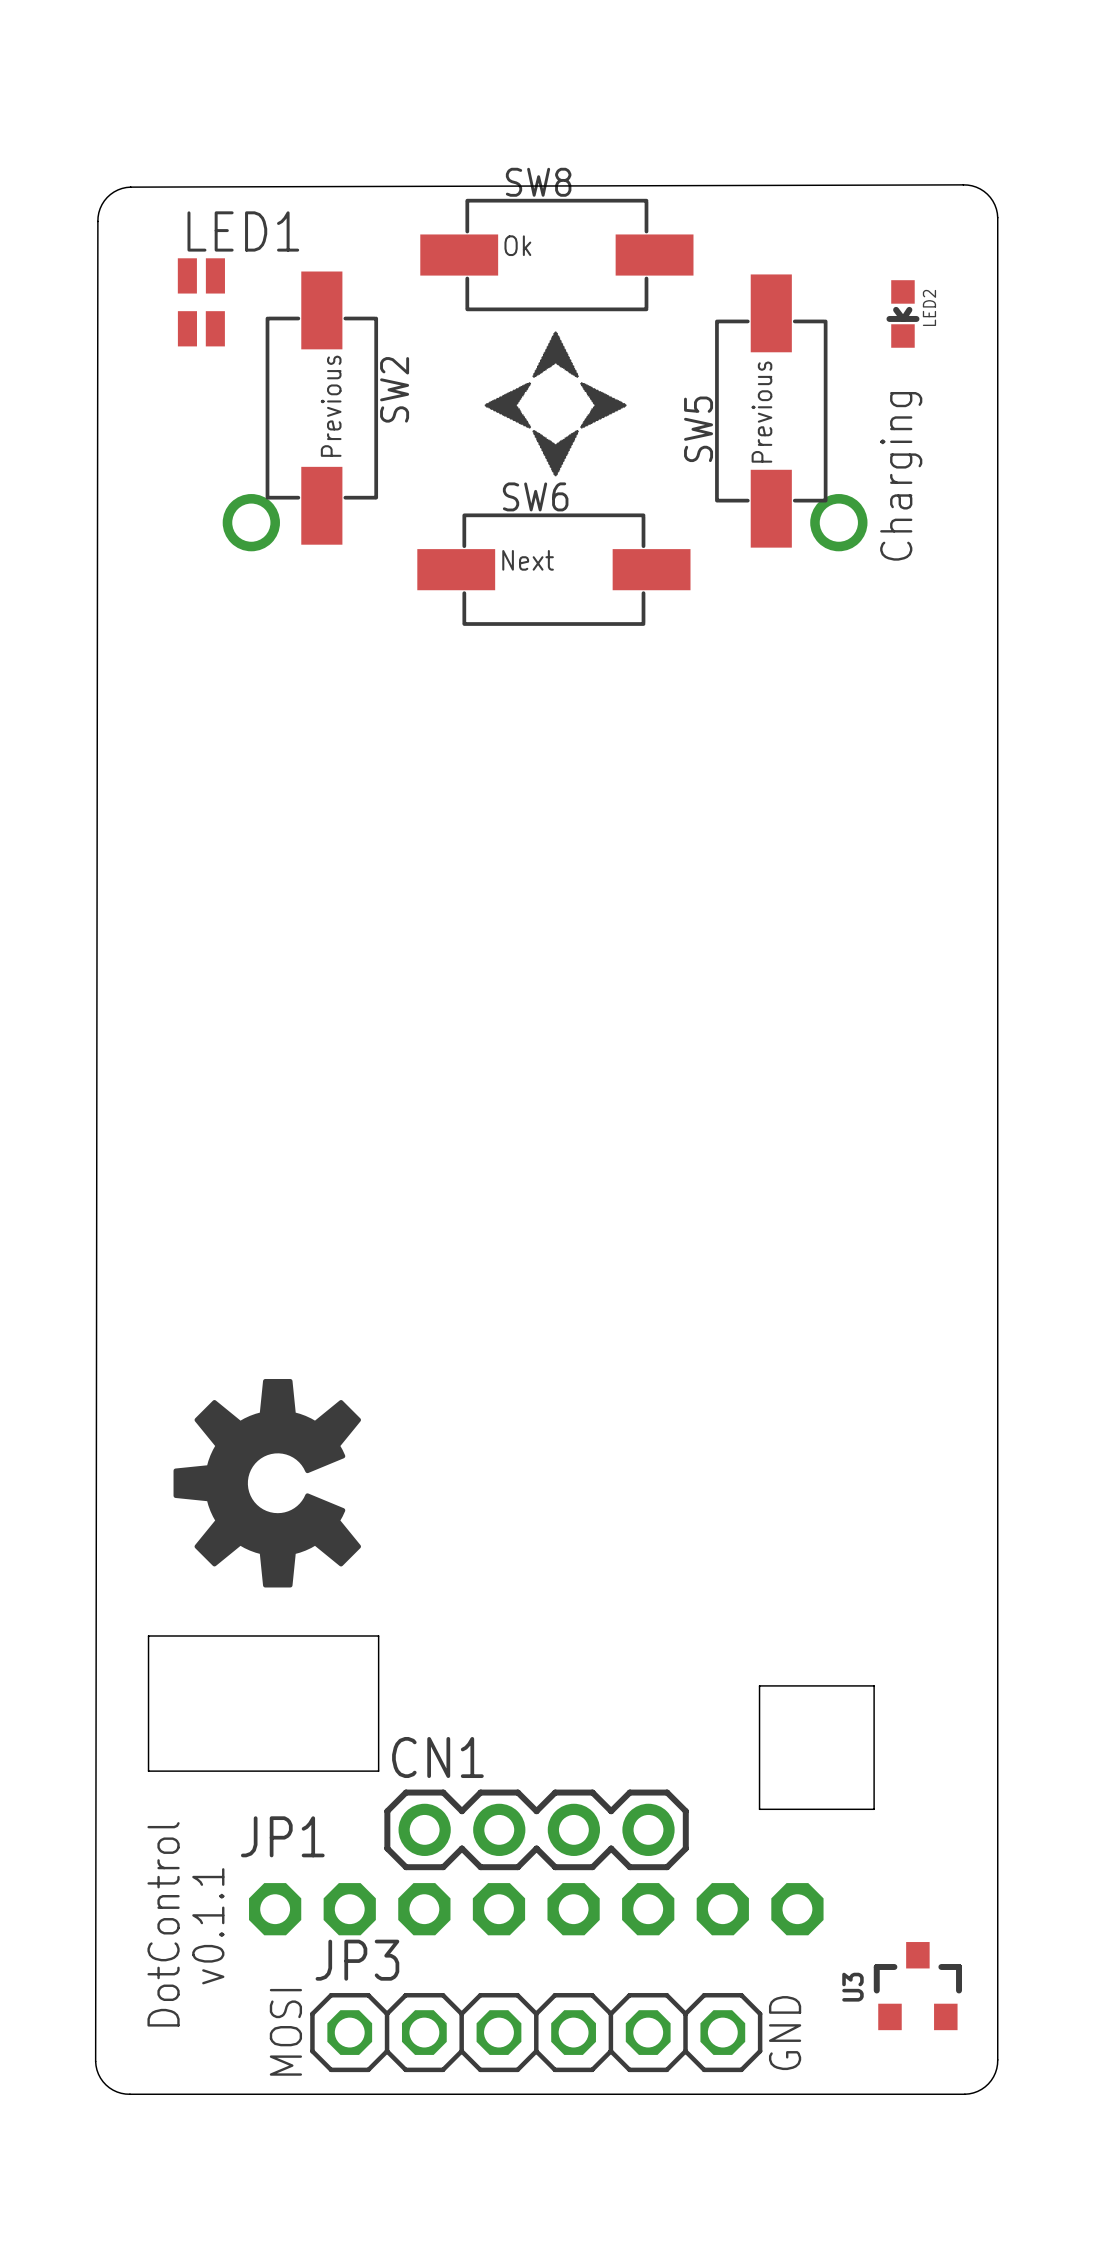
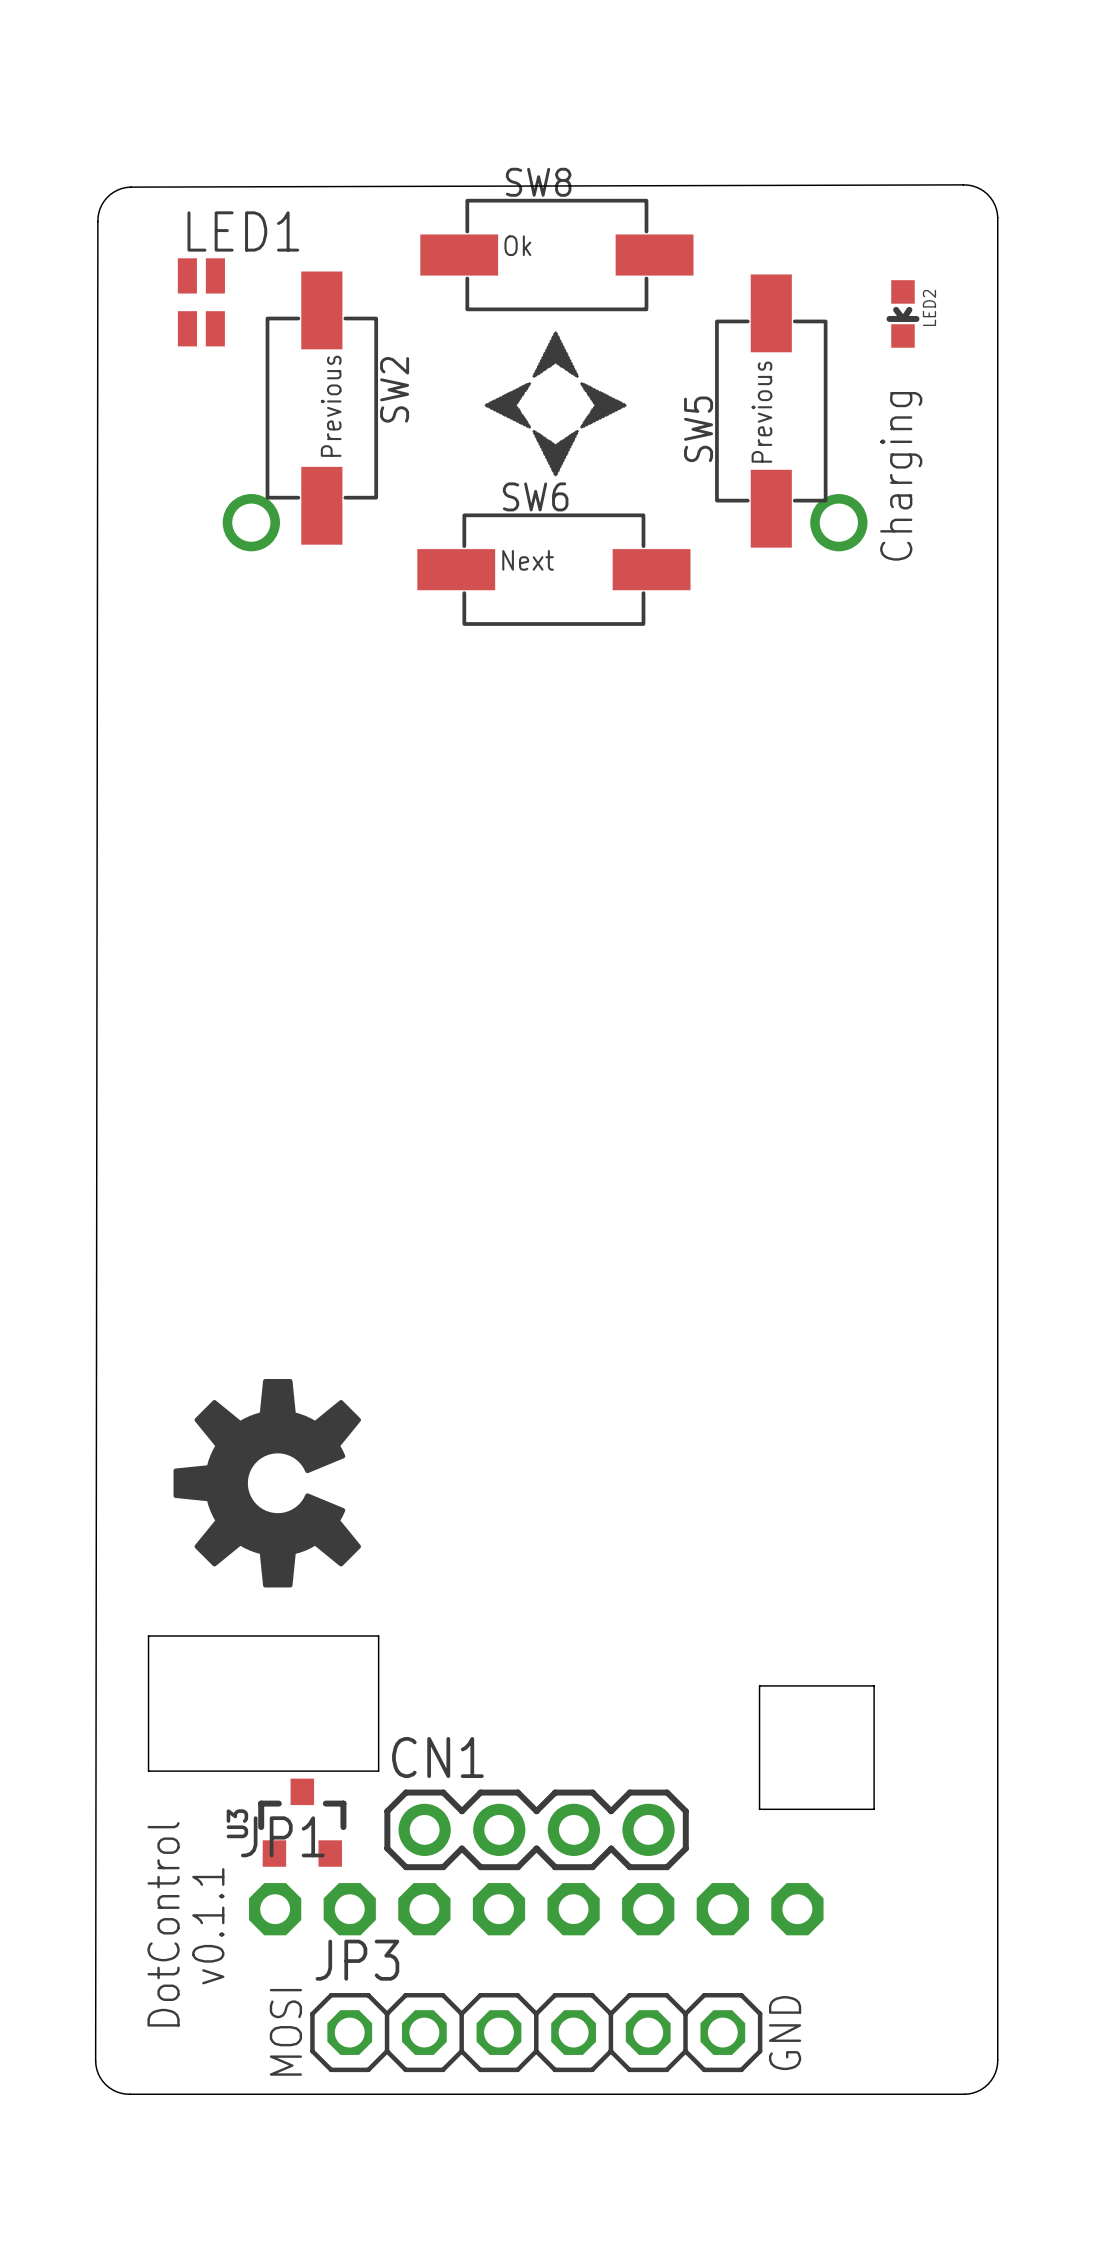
U3 position: (917, 1986) -> (302, 1822)

